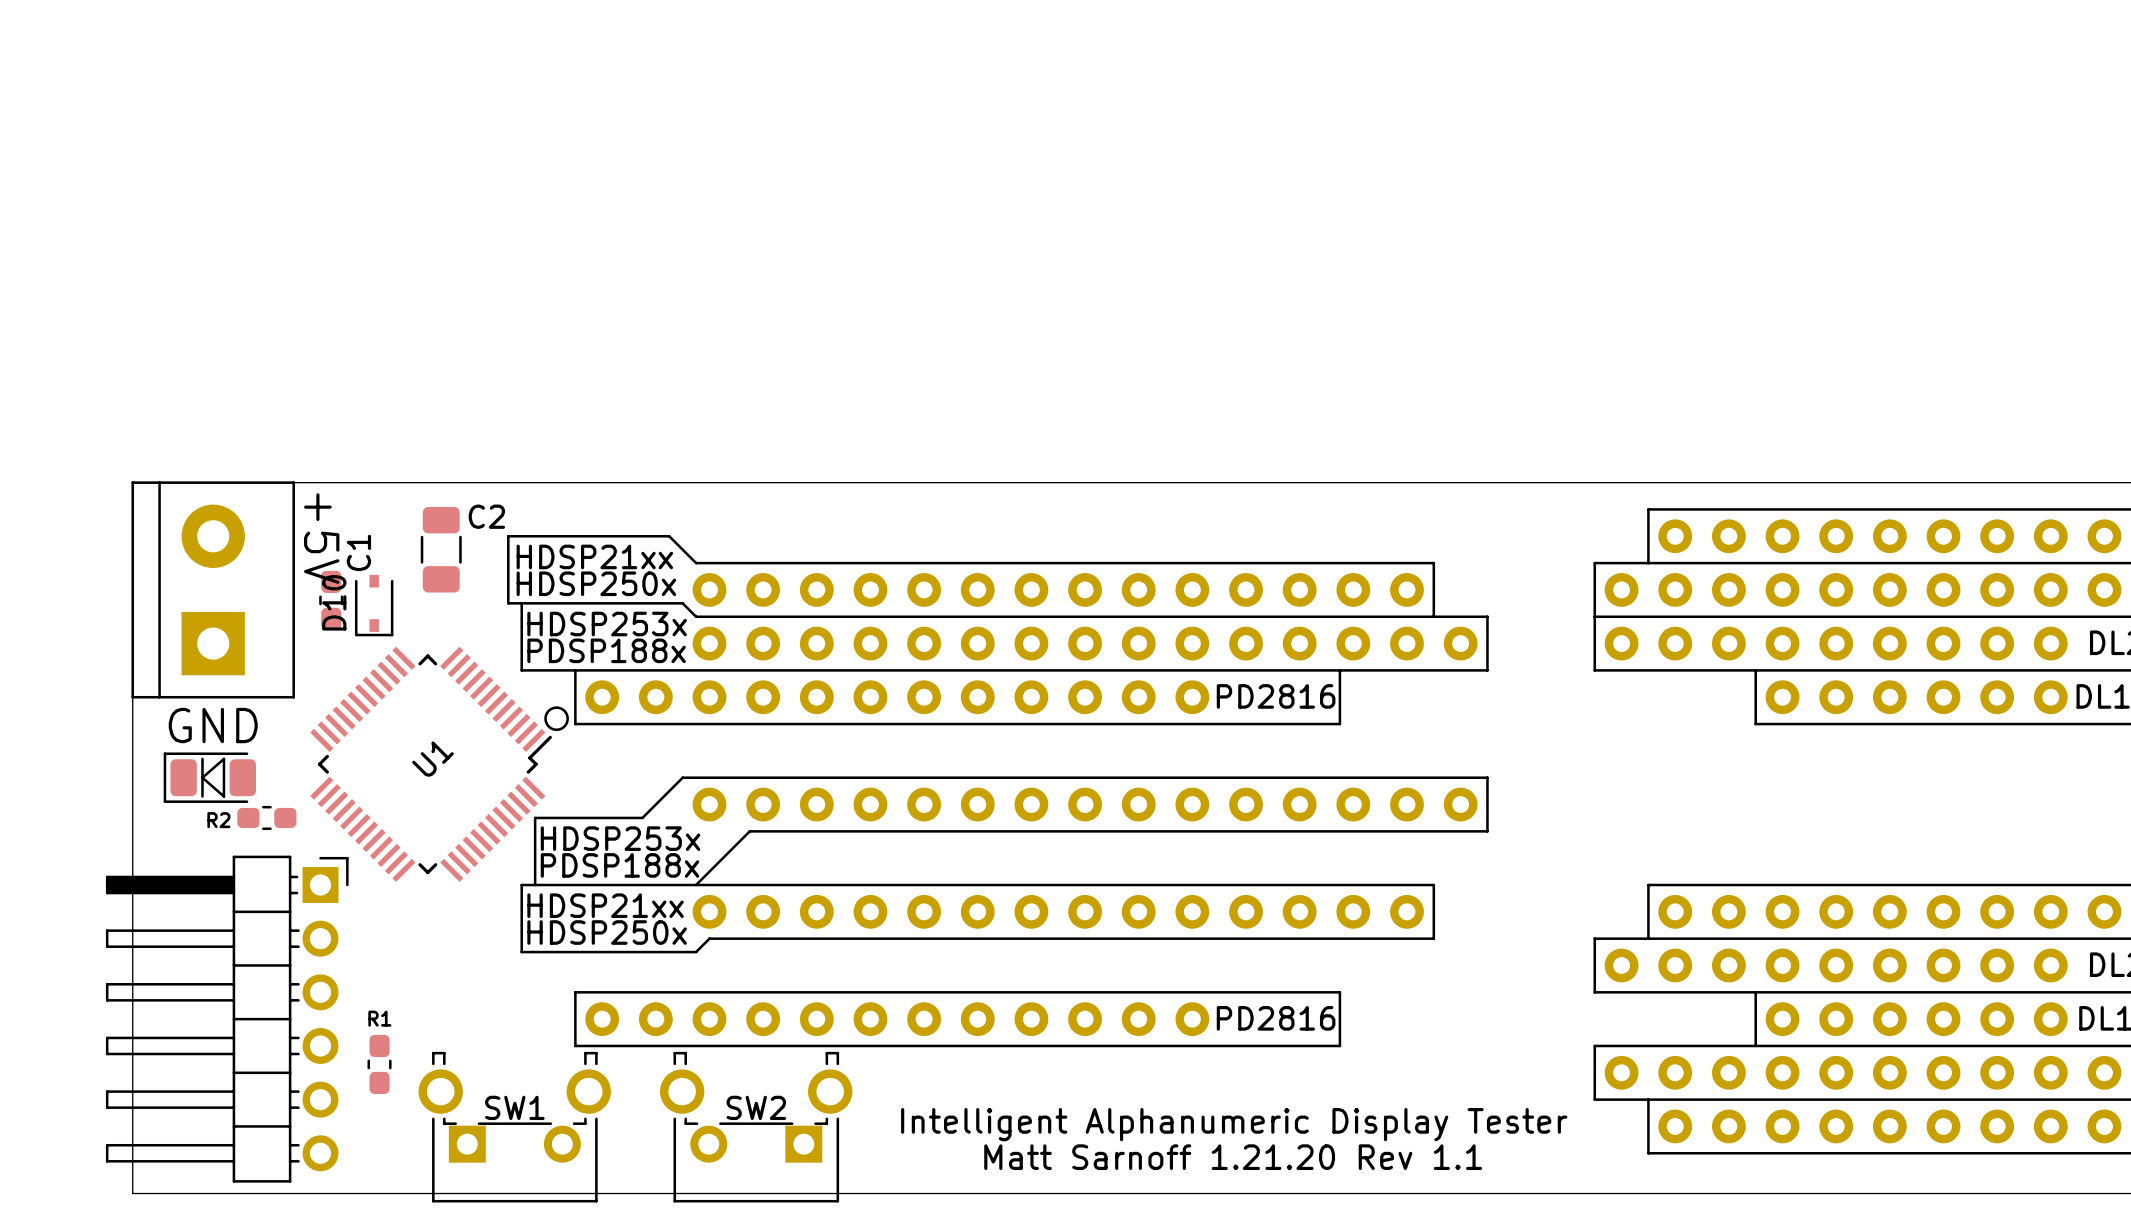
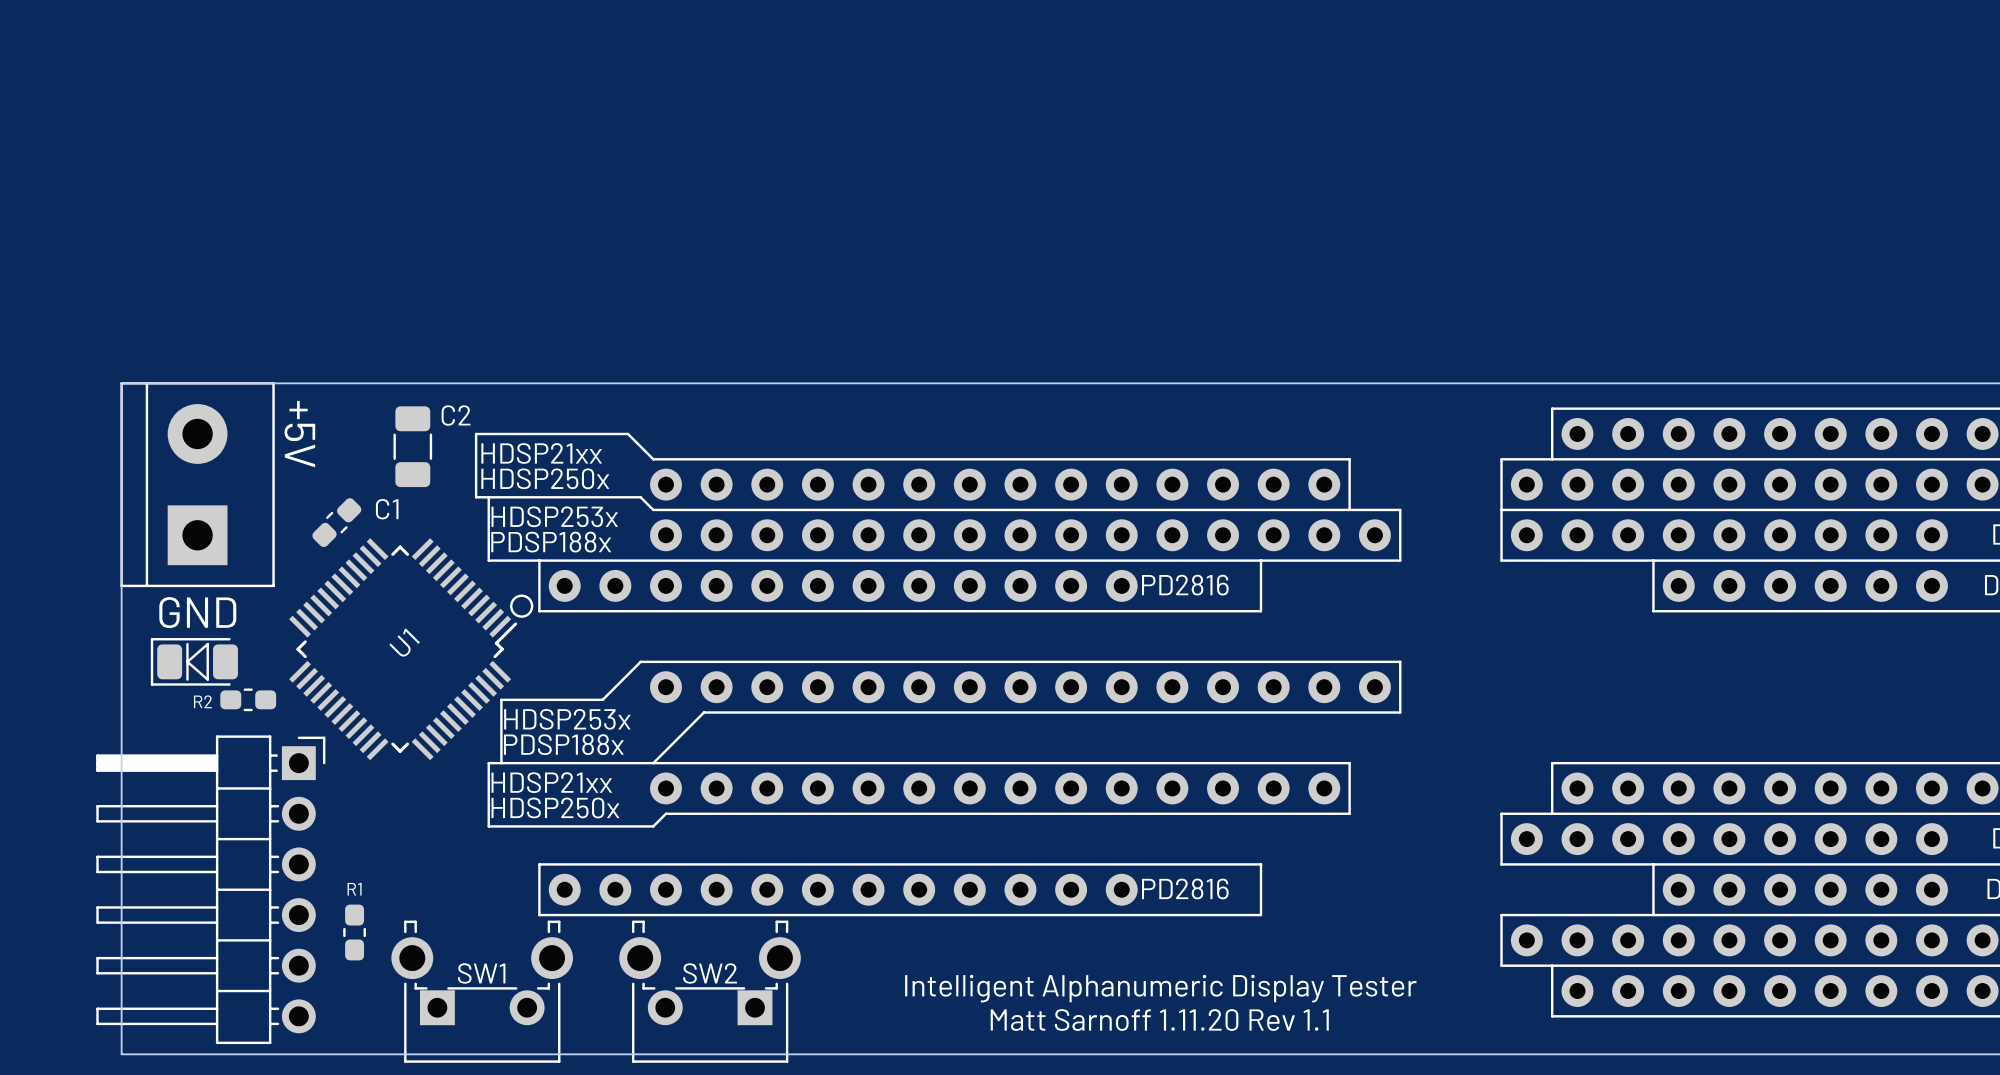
C1 rotation: 0° (331, 600) -> 45° clockwise (336, 522)
C1 position: (331, 600) -> (336, 522)
D10: (374, 605) -> none
text: Matt Sarnoff 1.21.20 Rev 1.1 (1233, 1157) -> Matt Sarnoff 1.11.20 Rev 1.1 (1159, 1020)

